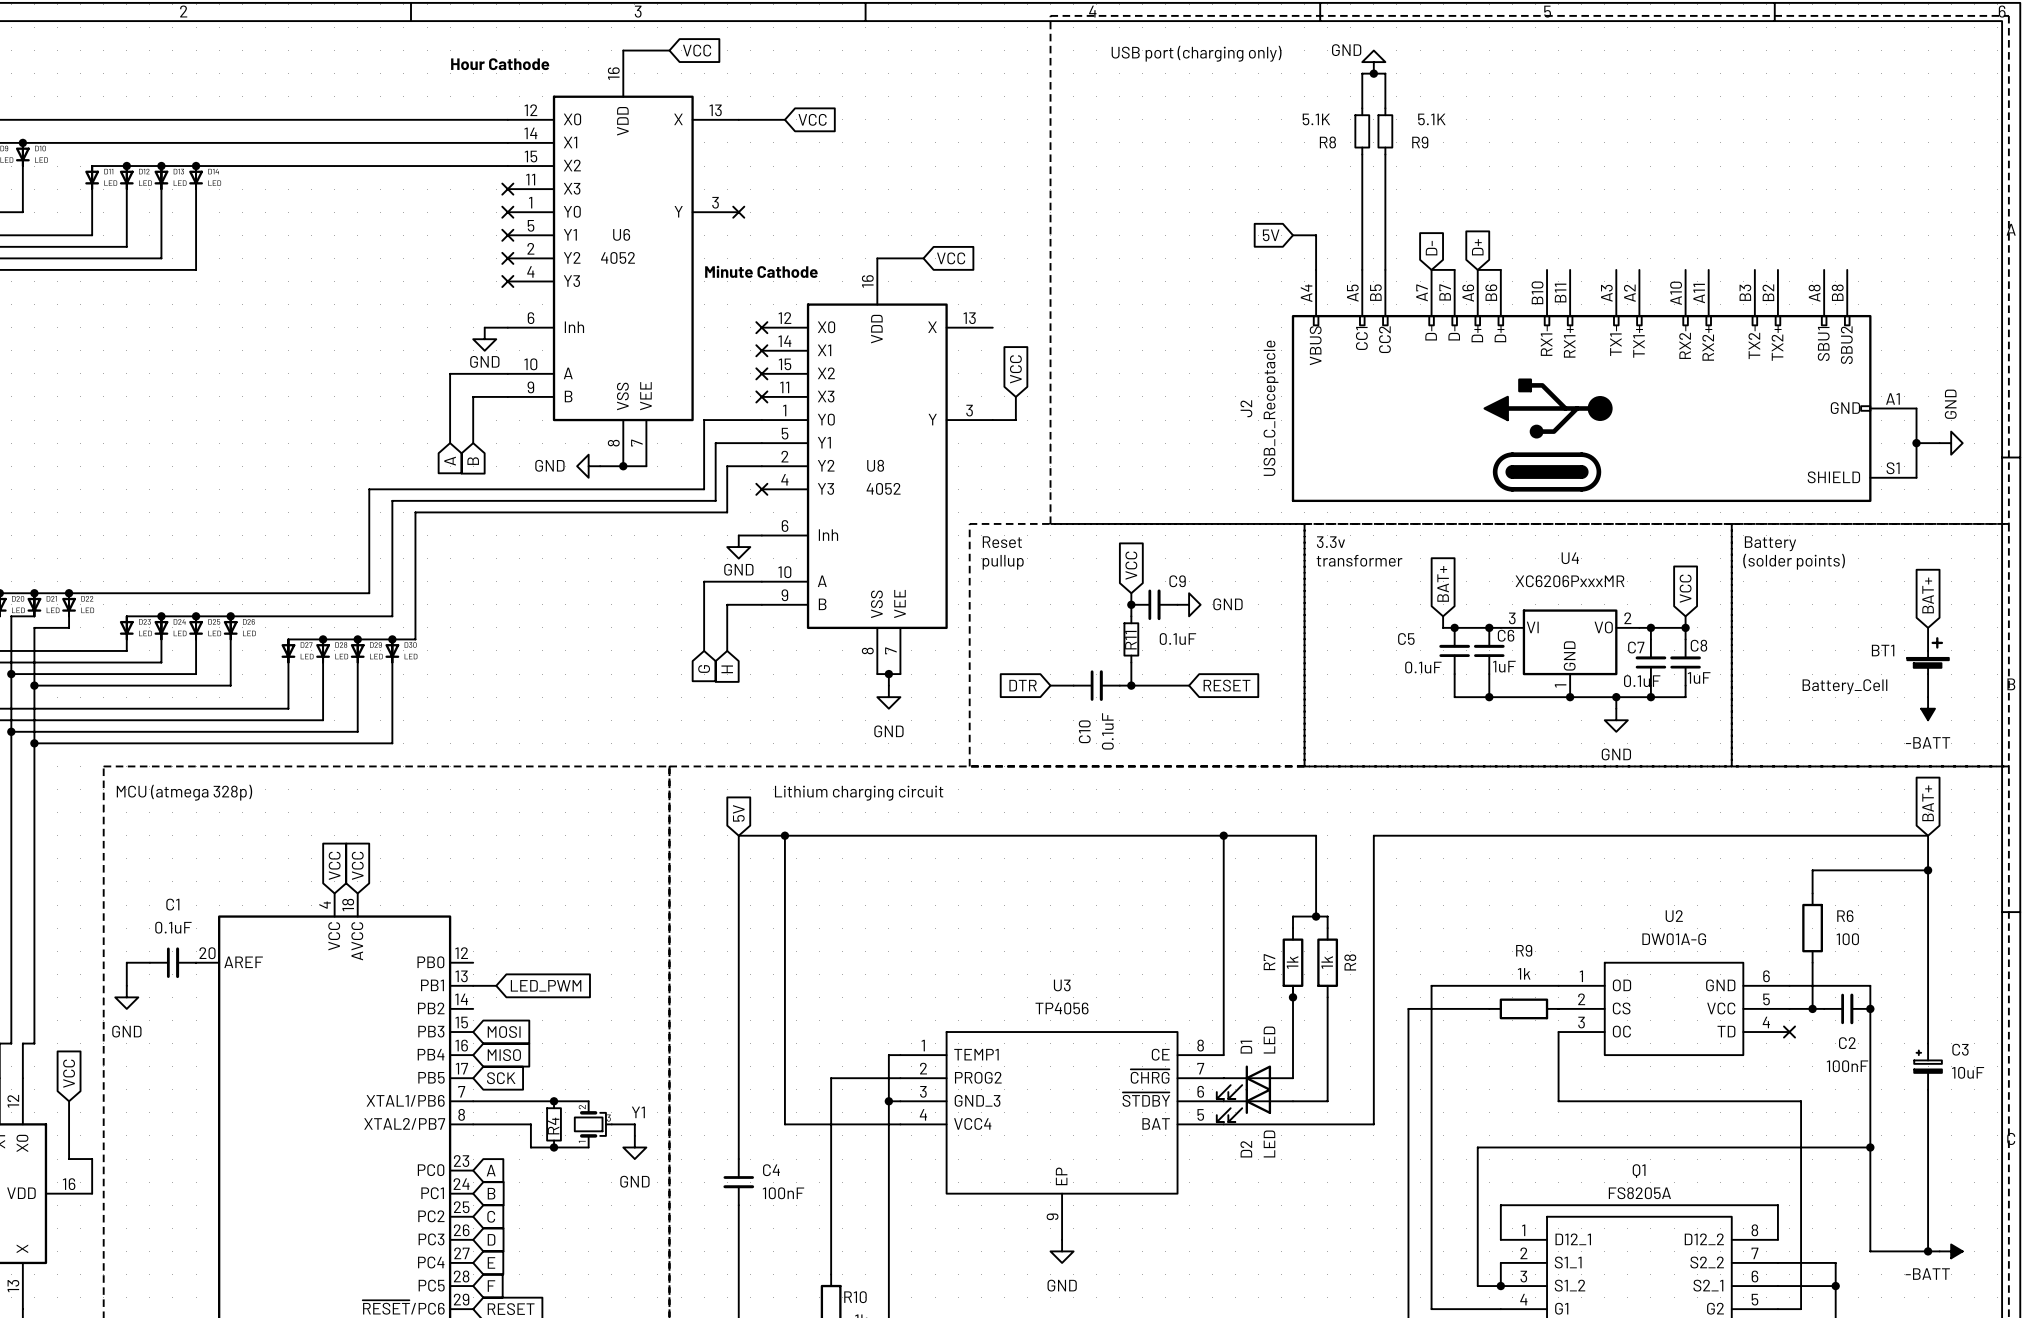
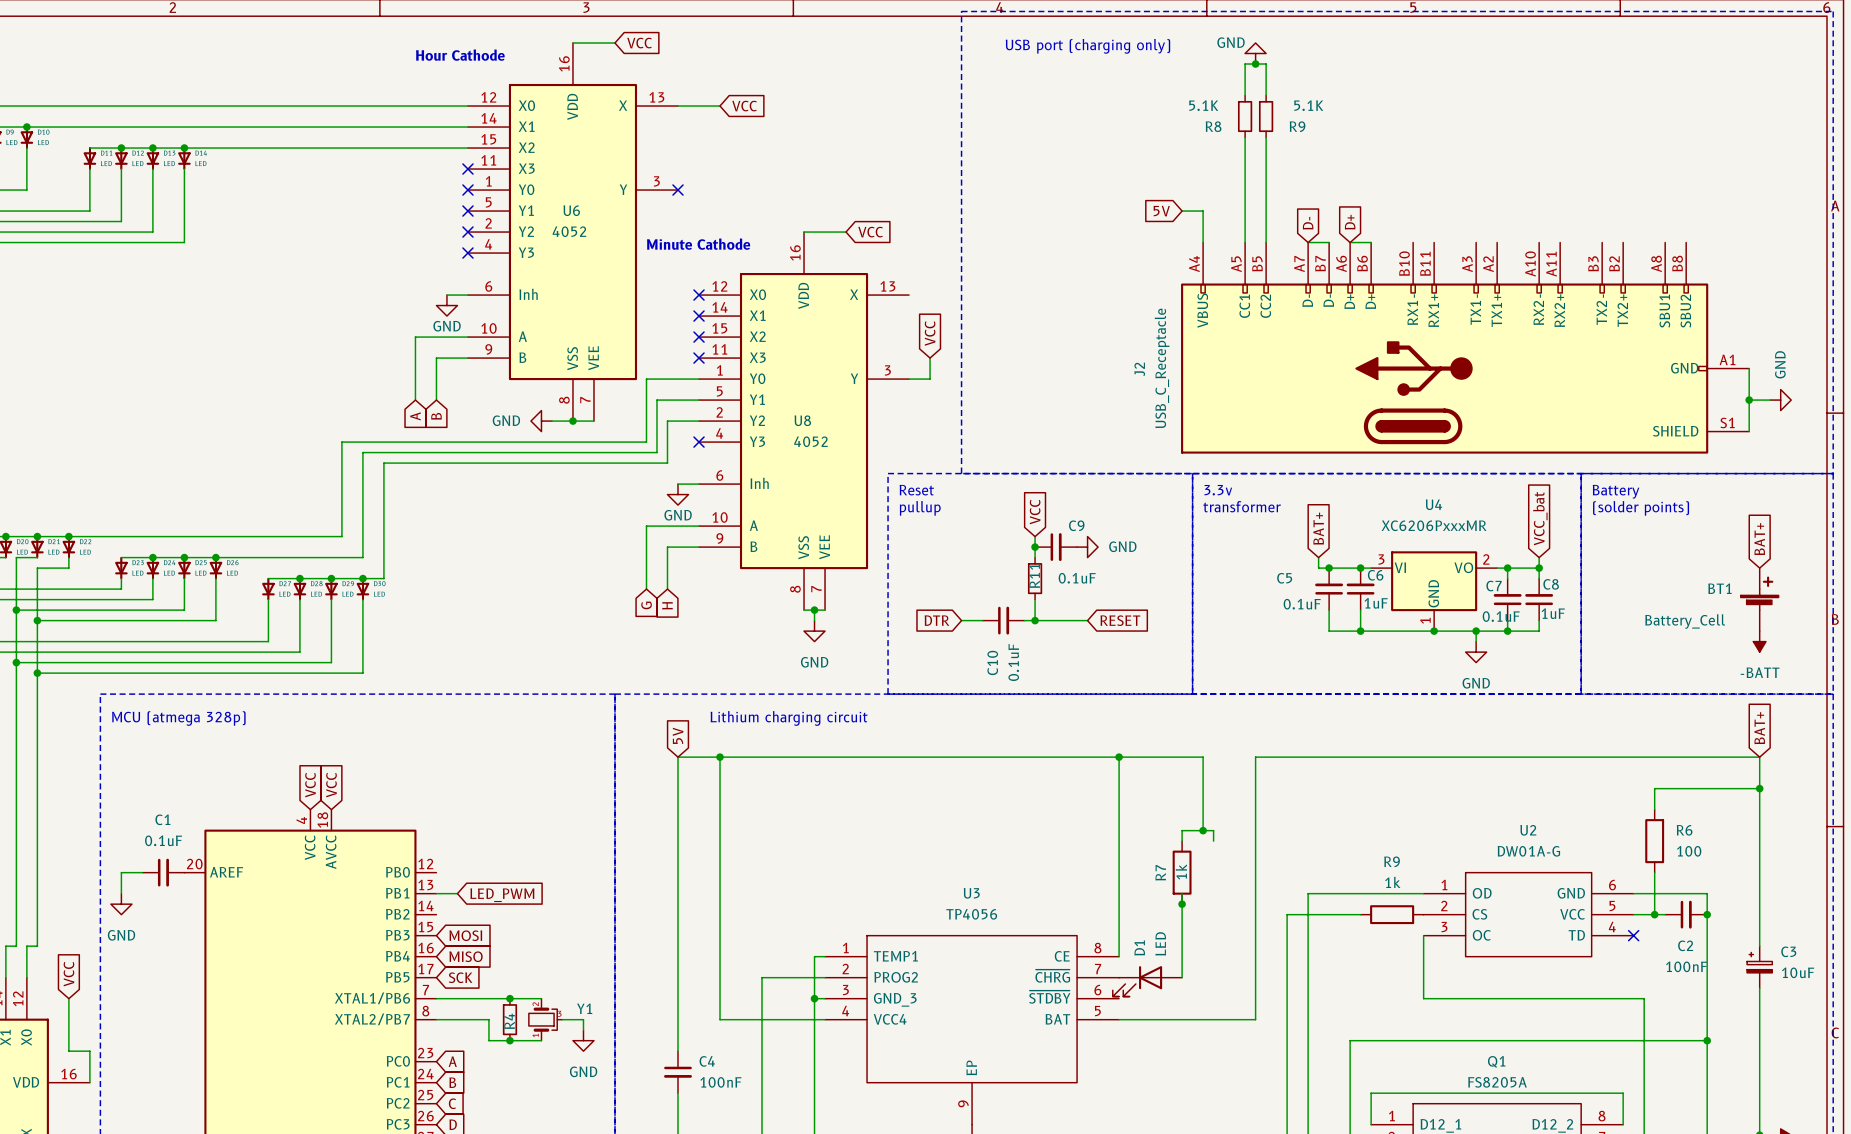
global label: VCC (1685, 588) -> VCC_bat (1540, 518)
R8: 1k (1327, 962) -> none
wire: (1327, 997) (1327, 1101) (1293, 1101) -> none
D2: LED (1254, 1105) -> none

